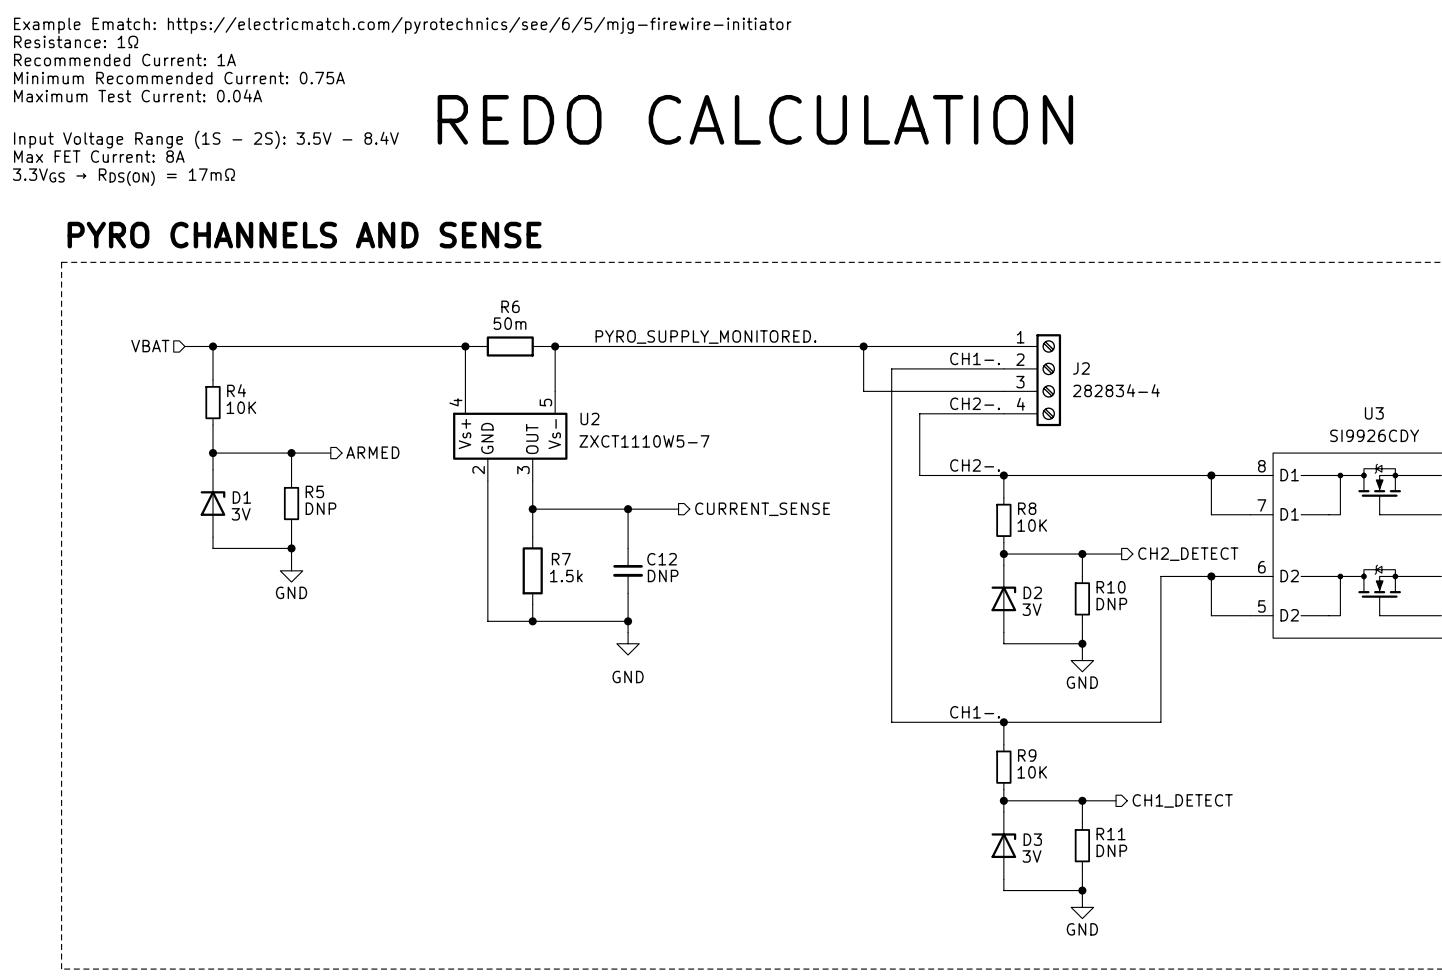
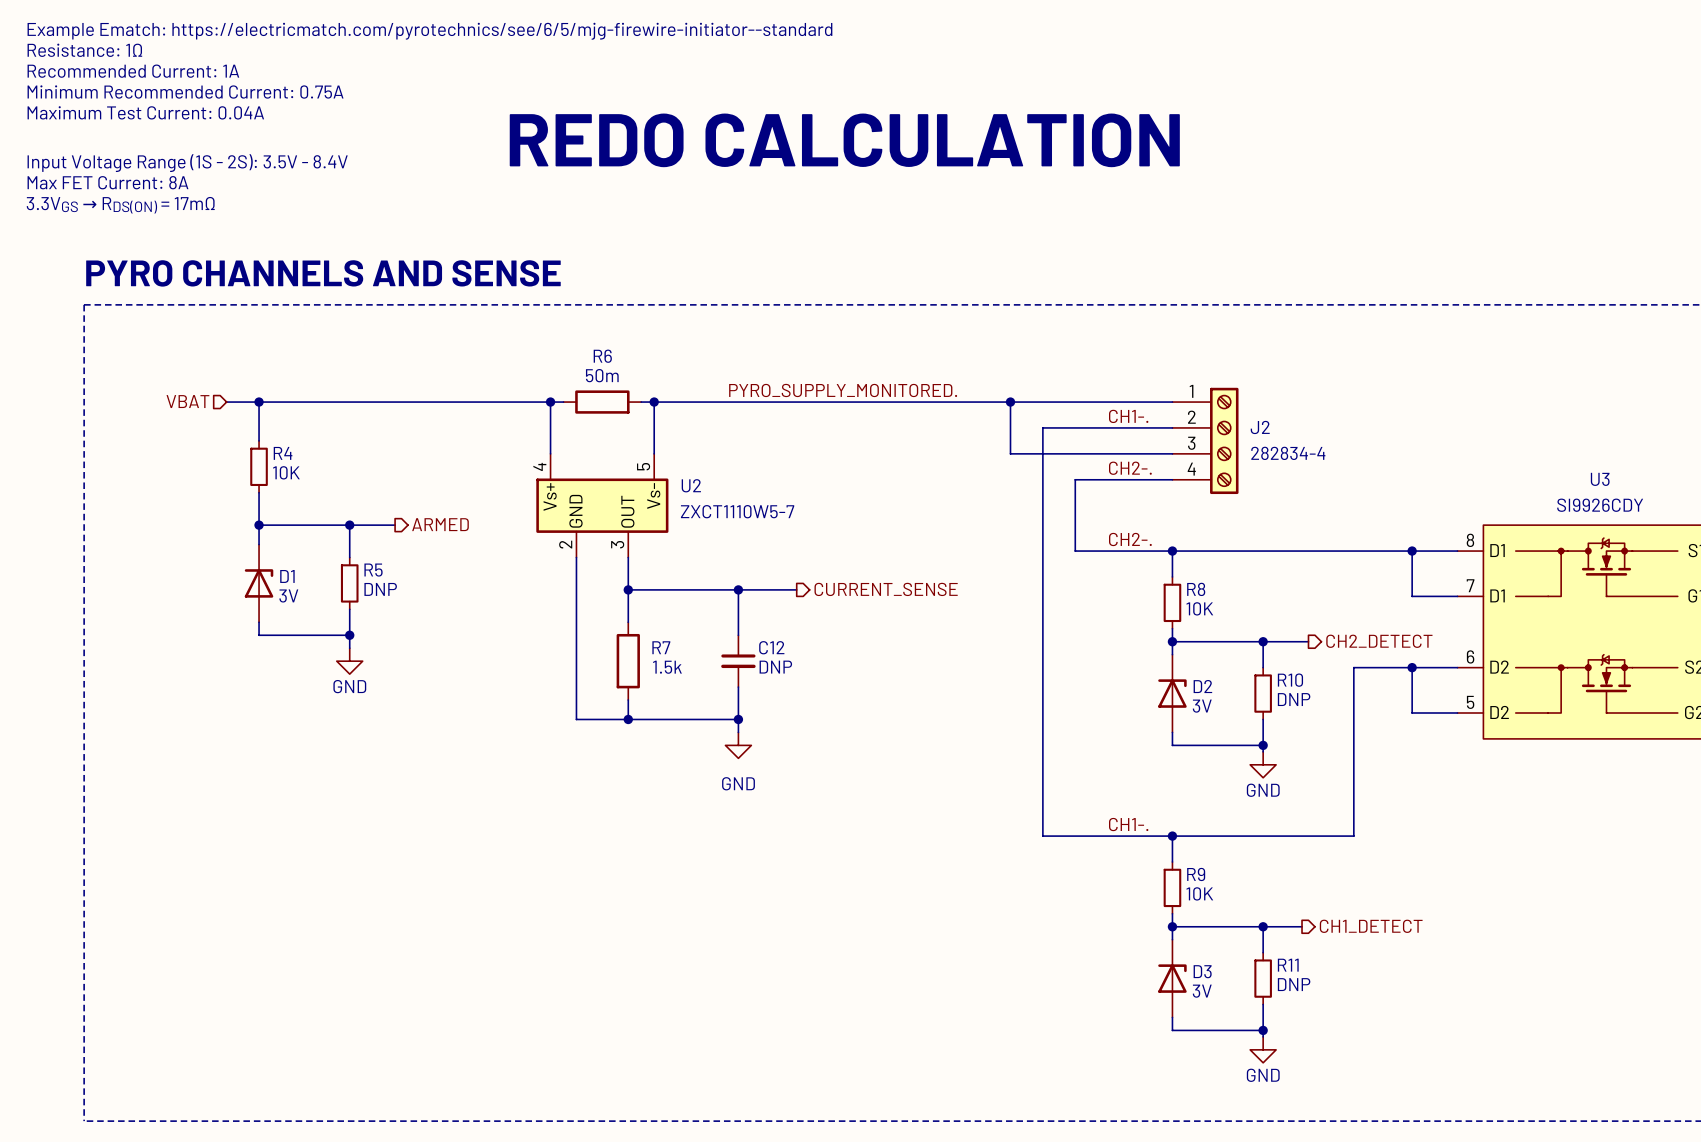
text: Example Ematch: https://electricmatch.com/pyrotechnics/see/6/5/mjg-firewire-initiator (402, 25) -> Example Ematch: https://electricmatch.com/pyrotechnics/see/6/5/mjg-firewire-initiator--standard (429, 31)

